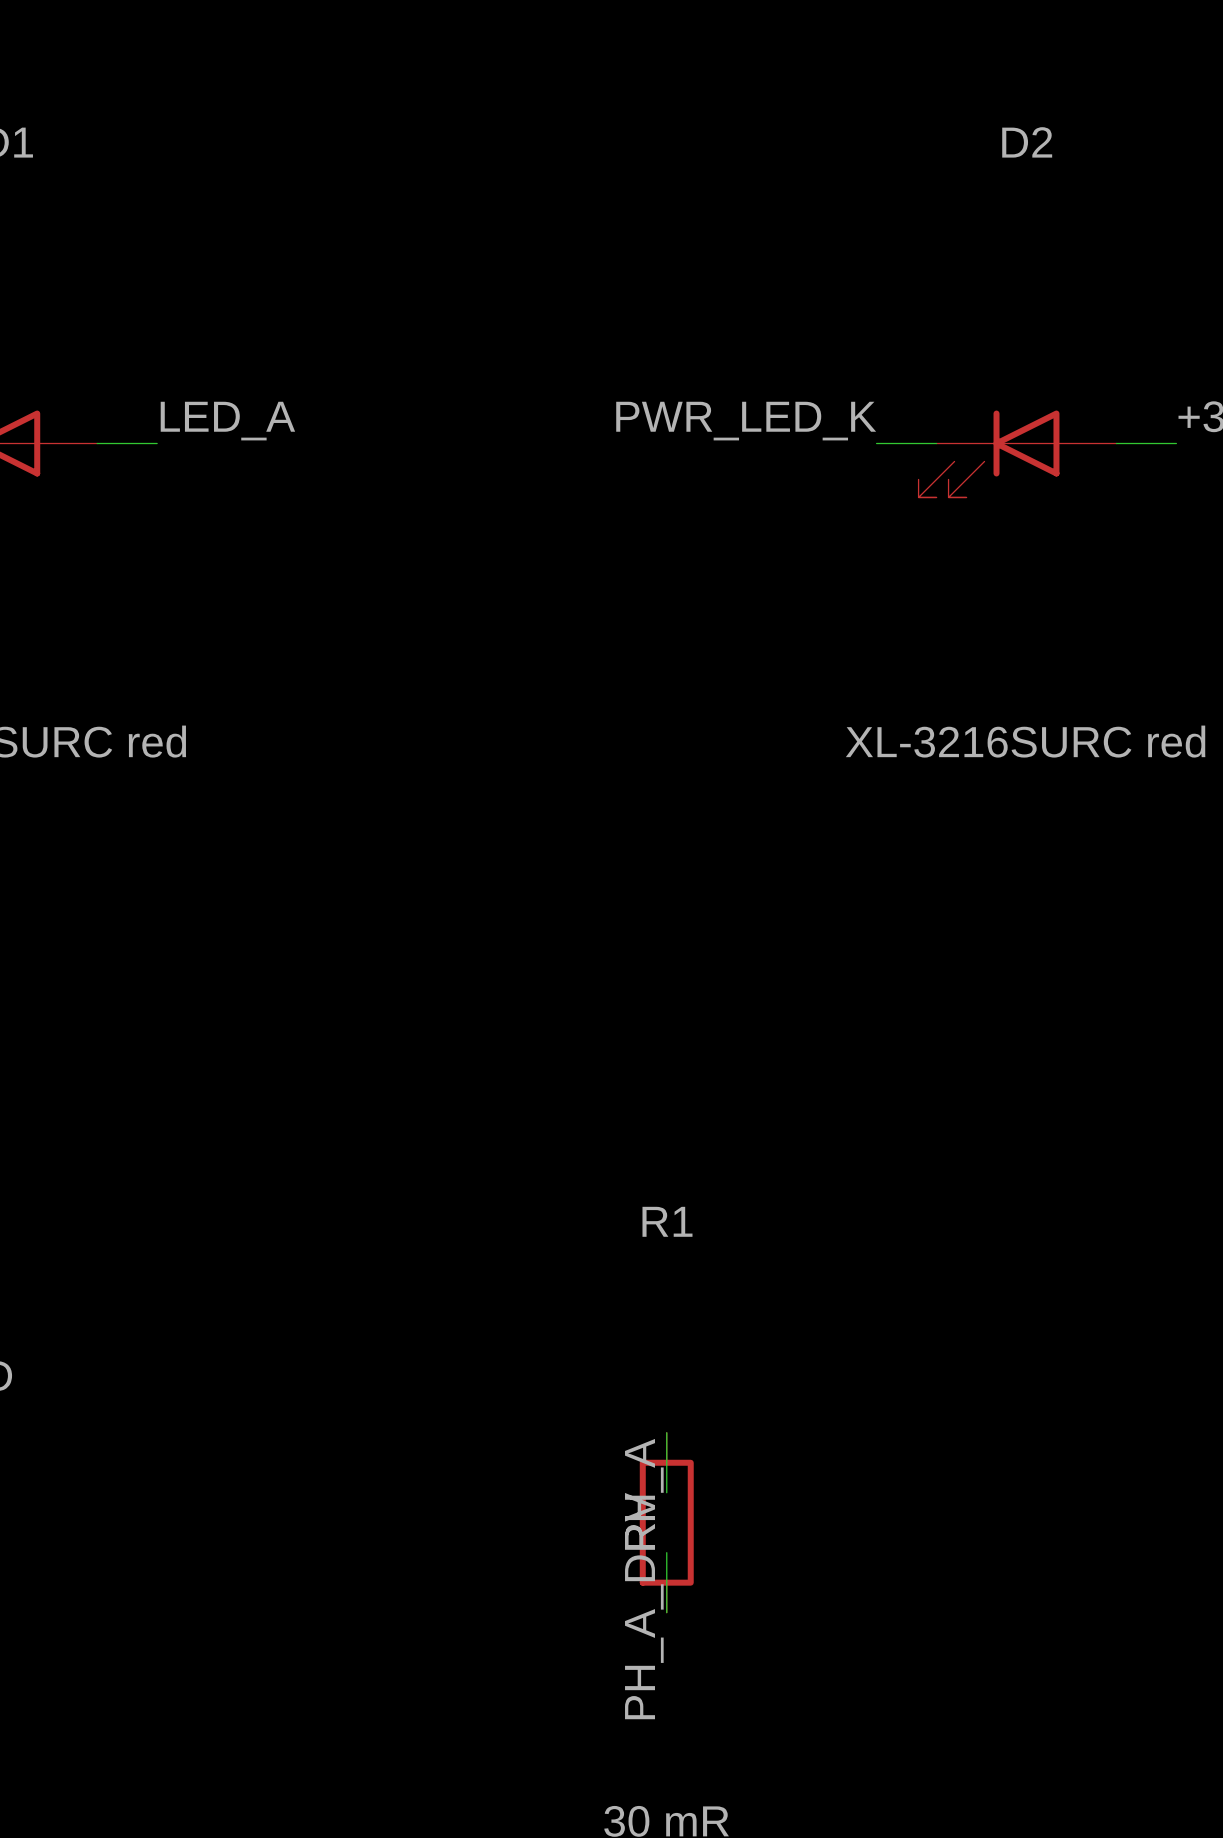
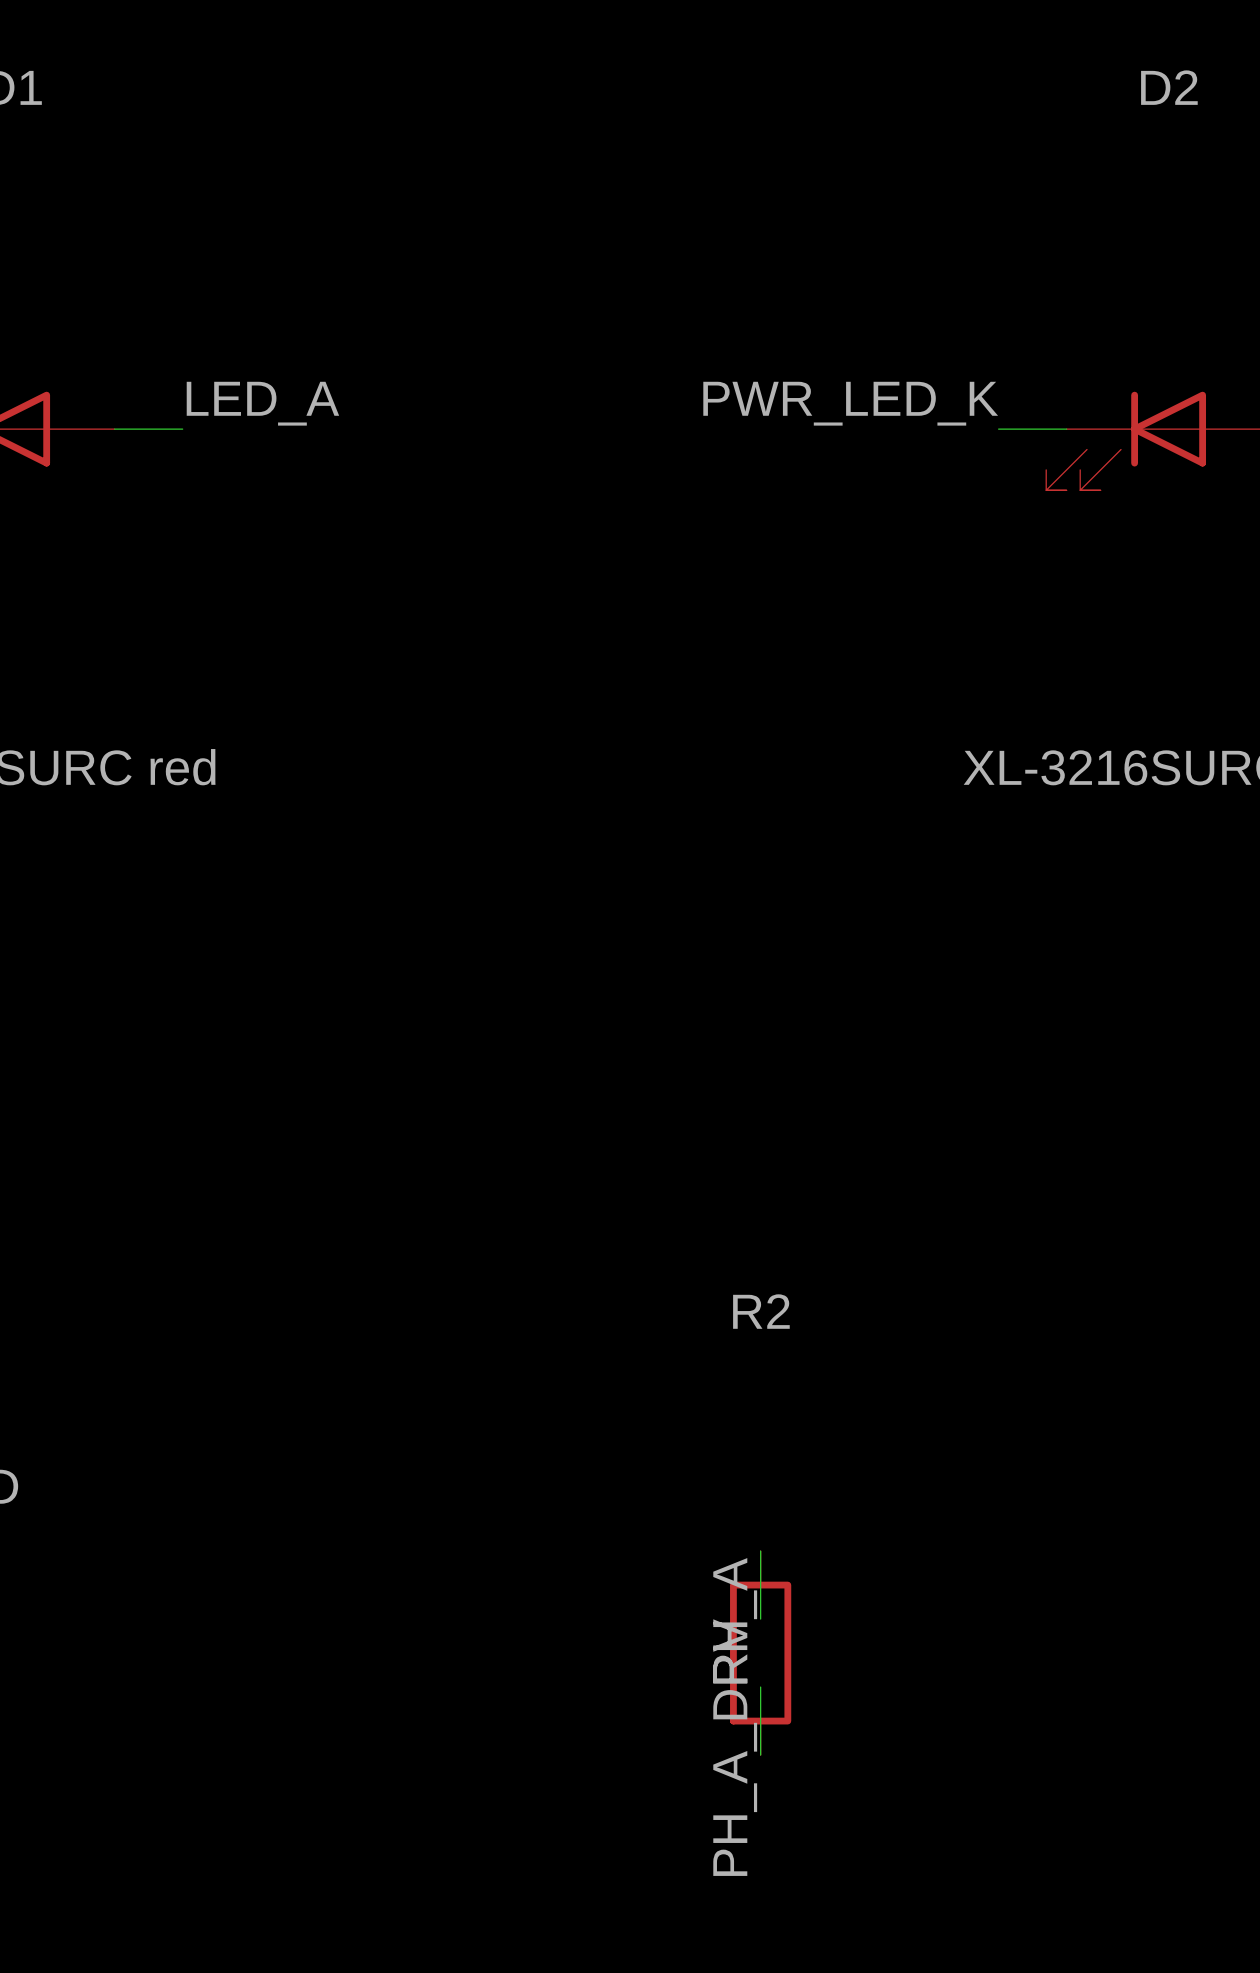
R1 name: R1 (667, 1221) -> R2 (761, 1311)

